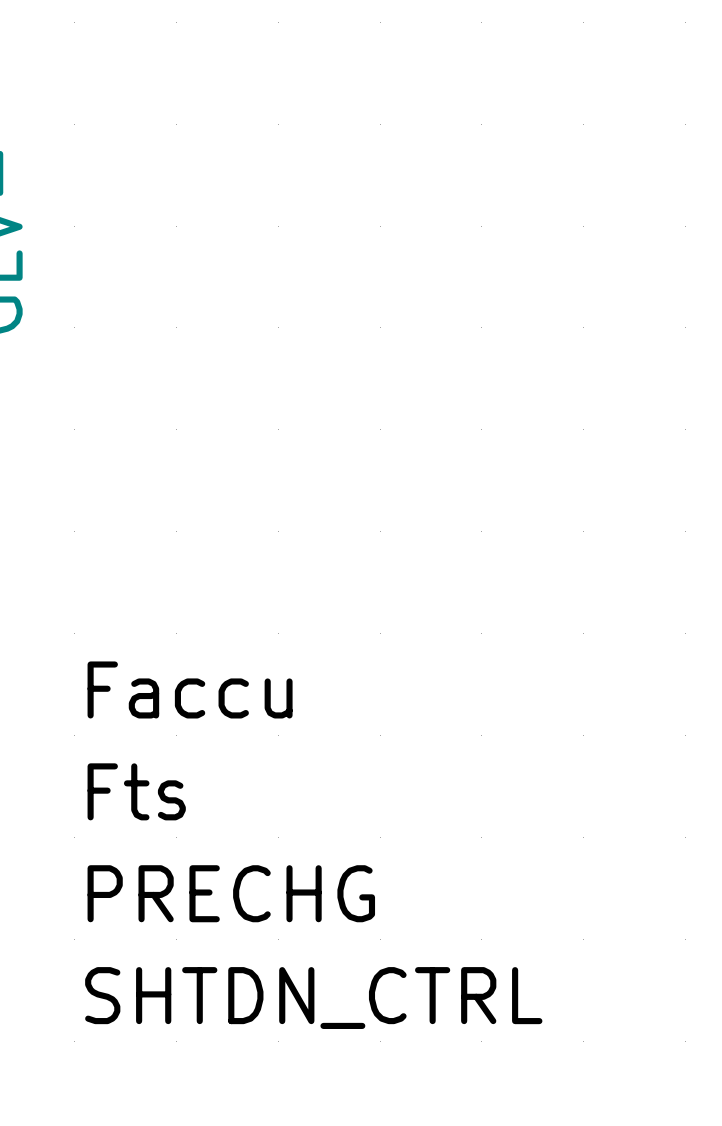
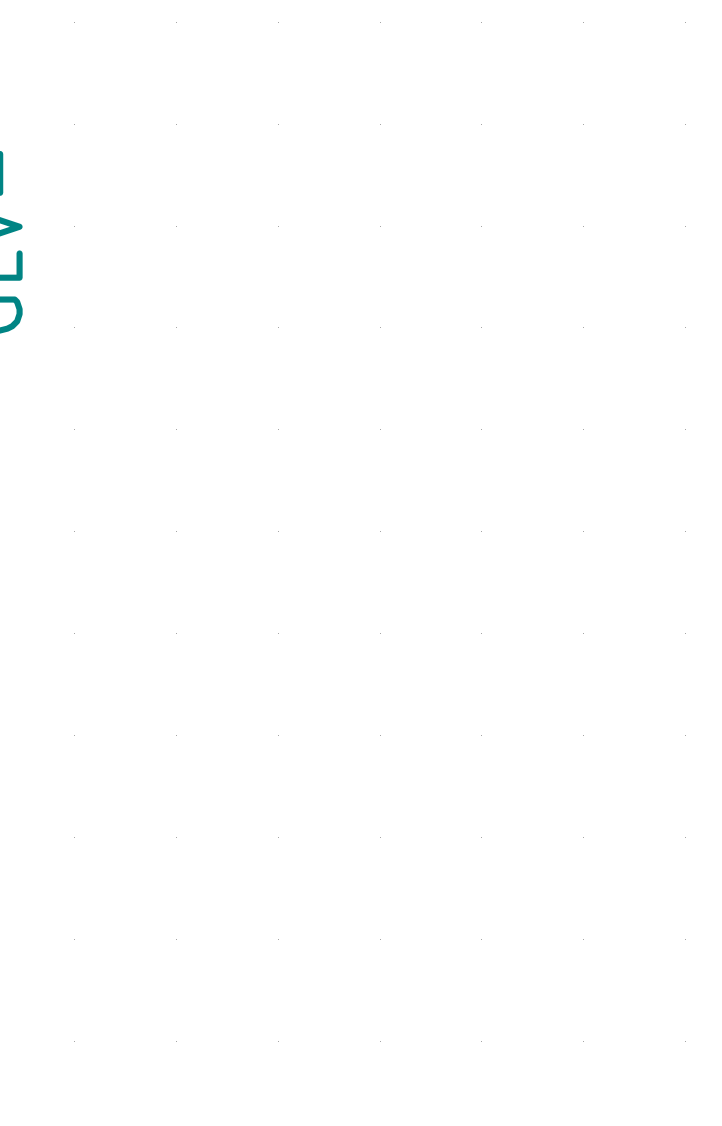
label: Faccu (190, 689) -> none
label: Fts (136, 791) -> none
label: PRECHG (231, 893) -> none
label: SHTDN_CTRL (313, 998) -> none

